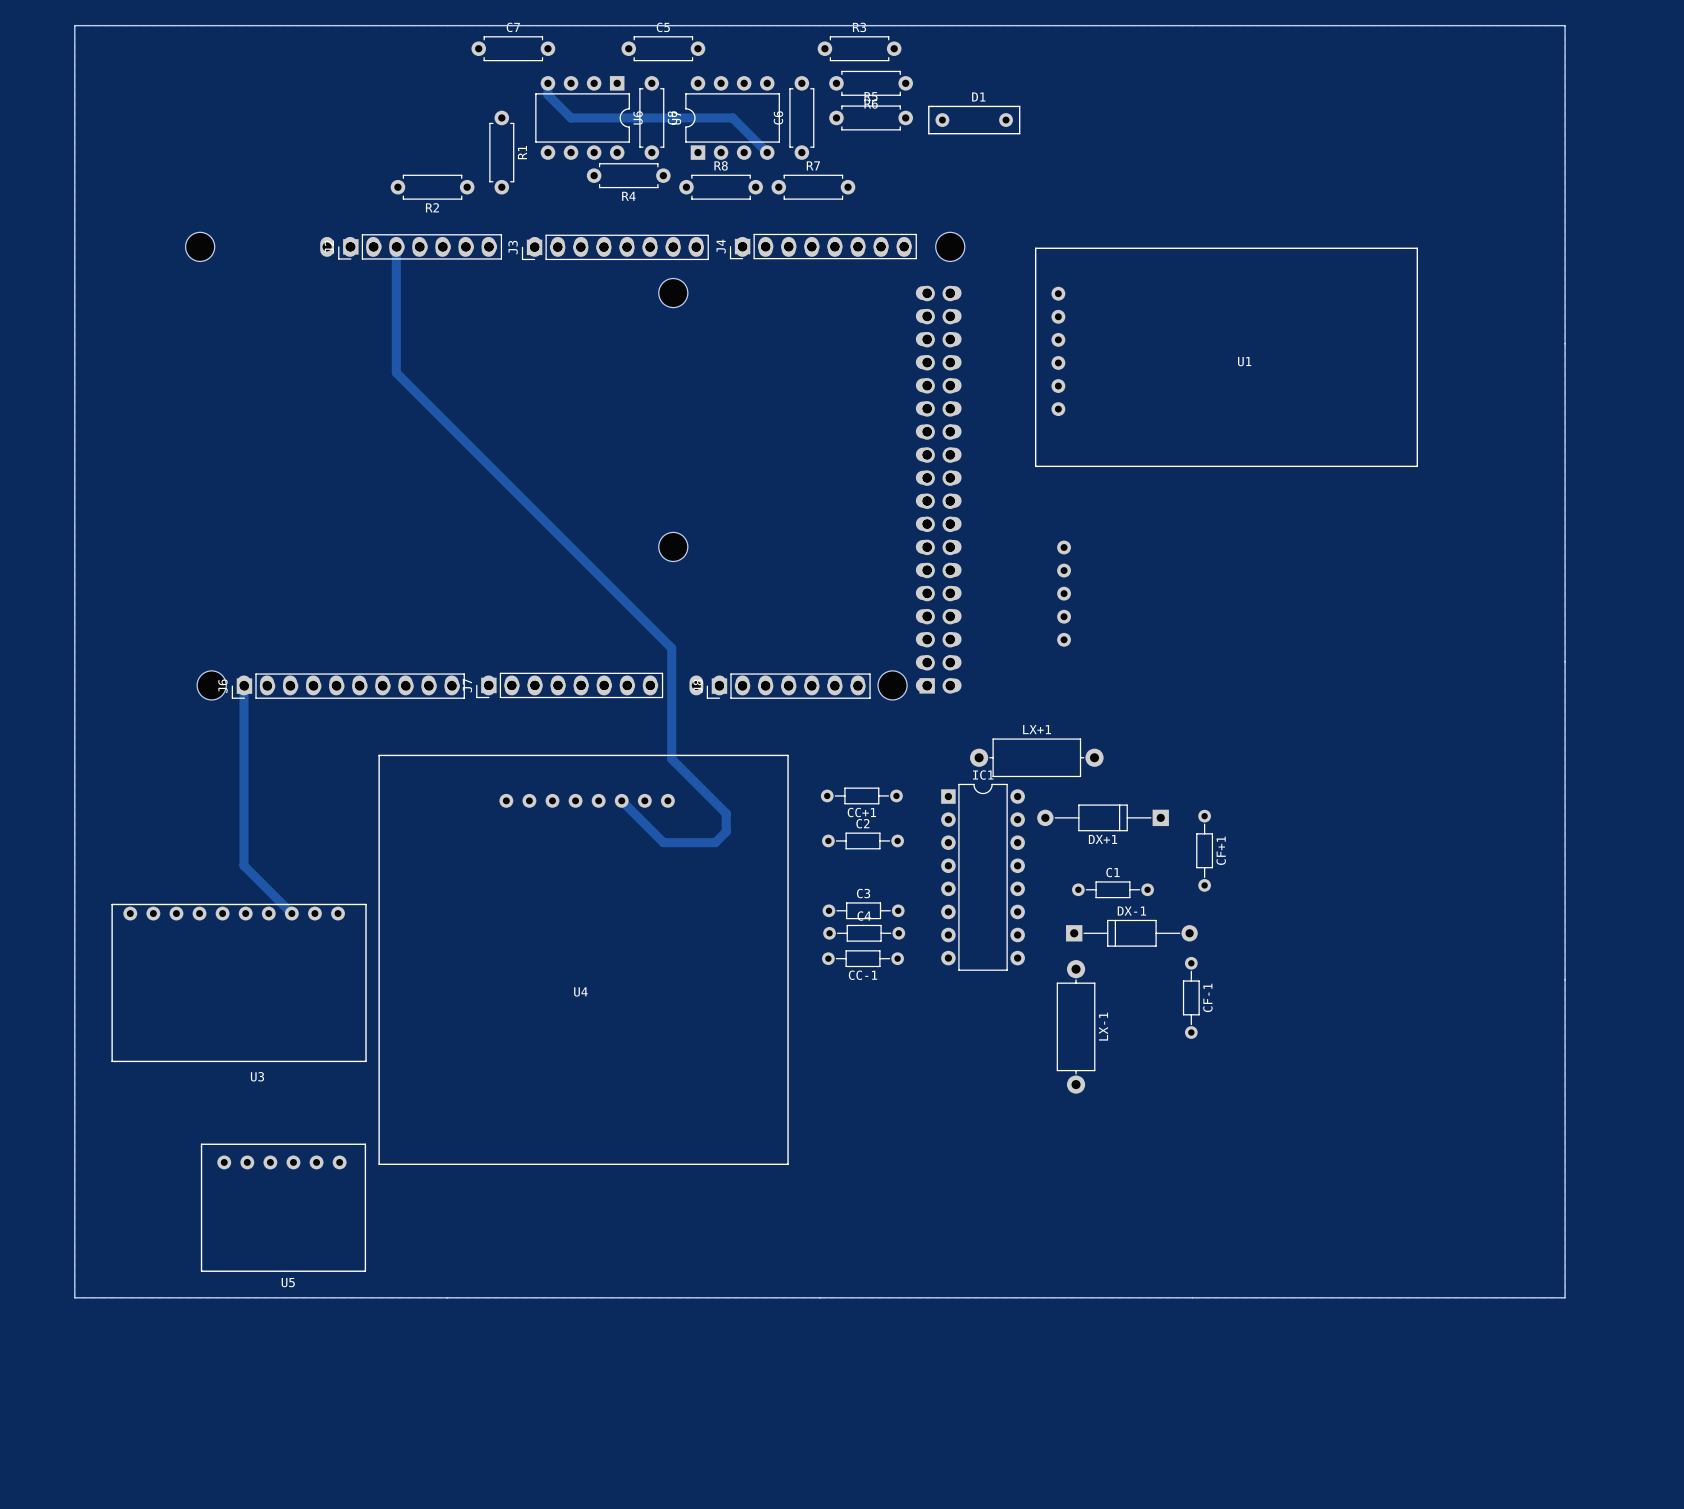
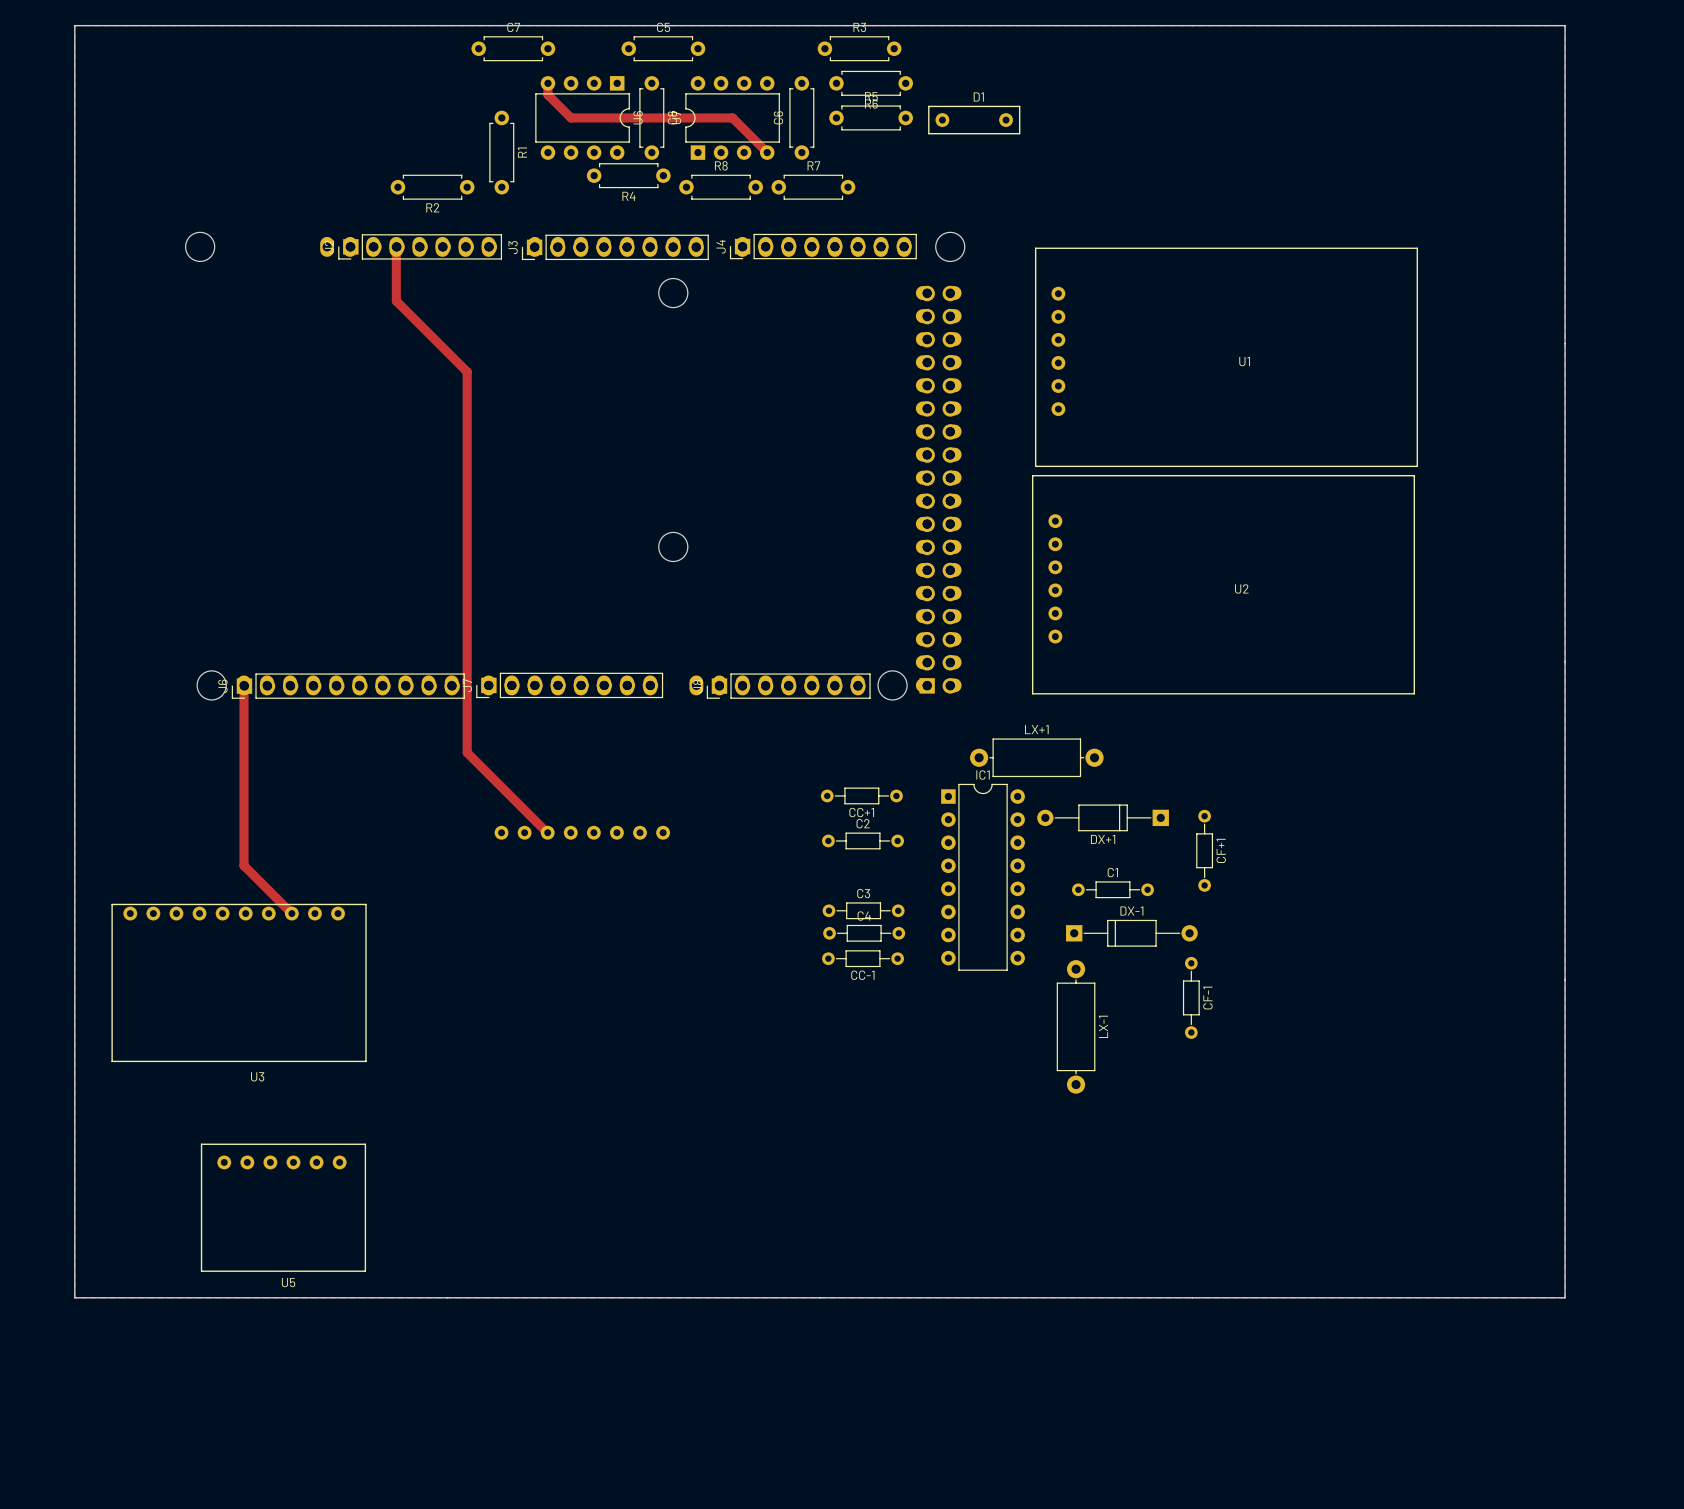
track: (396, 301) (396, 372) (671, 648) (671, 759) (726, 813) (726, 831) (715, 842) (663, 842) (621, 800) -> (396, 301) (467, 371) (467, 752) (547, 832)
U2: none -> (1223, 584)
part: (1064, 593) -> none
U4 side: top (583, 959) -> bottom (582, 832)

